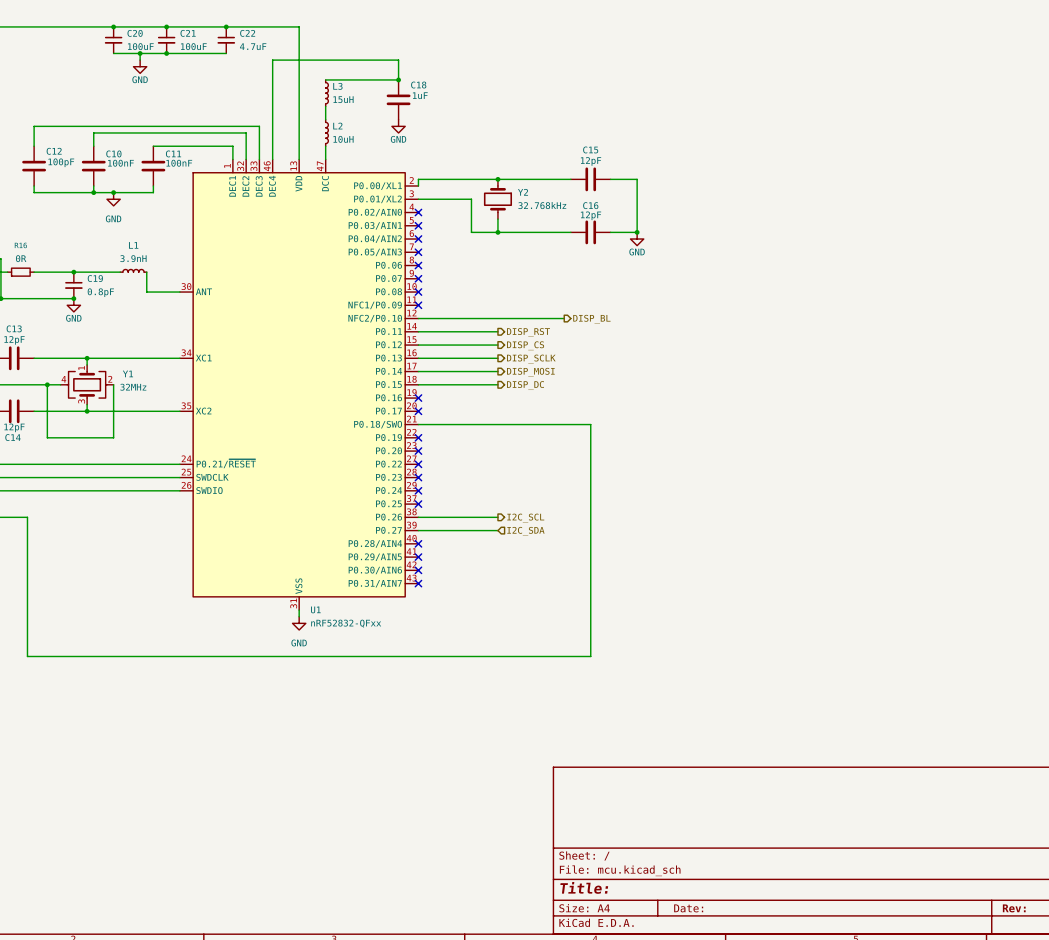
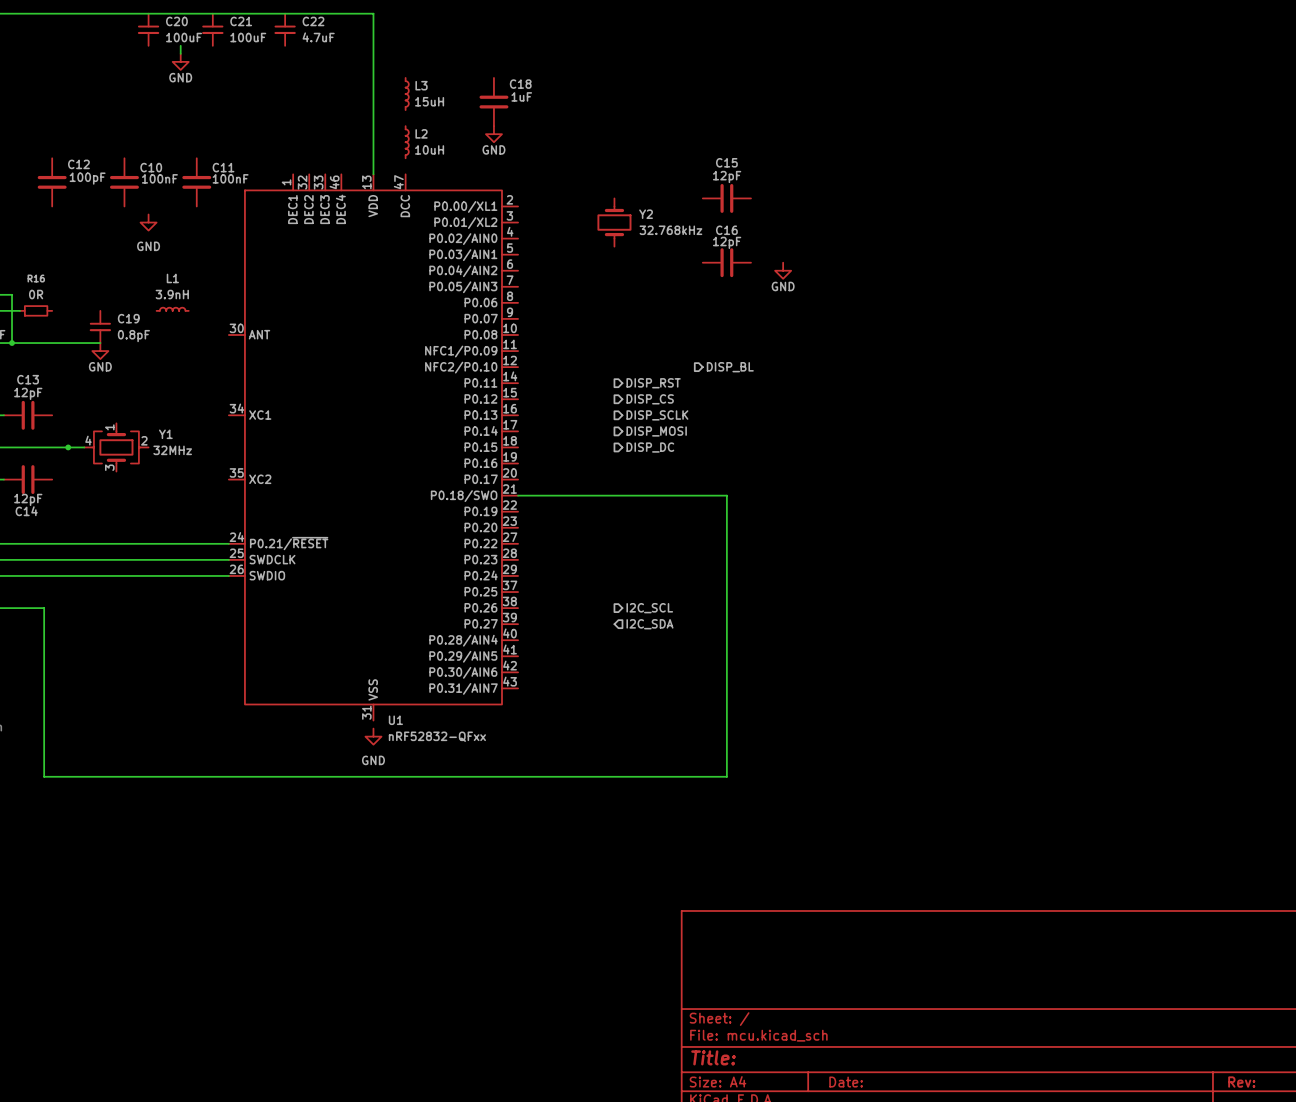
junction: (113, 26) -> none
junction: (166, 26) -> none
junction: (226, 26) -> none
wire: (113, 53) (226, 53) -> none
junction: (140, 53) -> none
junction: (166, 53) -> none
wire: (325, 79) (398, 79) (398, 60) (272, 60) (272, 159) -> none
junction: (398, 79) -> none
wire: (325, 106) (325, 119) -> none
wire: (34, 146) (34, 126) (259, 126) (259, 159) -> none
wire: (93, 146) (93, 132) (246, 132) (246, 159) -> none
wire: (153, 146) (232, 146) (232, 159) -> none
wire: (325, 146) (325, 159) -> none
junction: (497, 179) -> none
wire: (570, 179) (418, 179) (418, 186) -> none
wire: (610, 179) (637, 179) (637, 232) (610, 232) -> none
wire: (34, 186) (34, 192) (153, 192) (153, 186) -> none
wire: (93, 186) (93, 192) -> none
junction: (93, 192) -> none
junction: (113, 192) -> none
wire: (418, 199) (471, 199) (471, 232) (570, 232) -> none
no-connect mark: (418, 212) -> none
wire: (497, 219) (497, 232) -> none
no-connect mark: (418, 225) -> none
junction: (497, 232) -> none
junction: (637, 232) -> none
no-connect mark: (418, 239) -> none
no-connect mark: (418, 252) -> none
no-connect mark: (418, 265) -> none
wire: (34, 272) (120, 272) -> none
junction: (73, 272) -> none
wire: (146, 272) (146, 292) (179, 292) -> none
no-connect mark: (418, 278) -> none
no-connect mark: (418, 292) -> none
junction: (73, 298) -> none
no-connect mark: (418, 305) -> none
wire: (418, 318) (564, 318) -> none
wire: (418, 331) (497, 331) -> none
wire: (418, 345) (497, 345) -> none
wire: (34, 358) (179, 358) -> none
wire: (87, 358) (87, 364) -> none
junction: (87, 358) -> none
wire: (418, 358) (497, 358) -> none
wire: (418, 371) (497, 371) -> none
wire: (47, 384) (47, 437) (113, 437) (113, 384) -> none
wire: (418, 384) (497, 384) -> none
no-connect mark: (418, 398) -> none
wire: (87, 404) (87, 411) -> none
wire: (34, 411) (179, 411) -> none
junction: (87, 411) -> none
no-connect mark: (418, 411) -> none
no-connect mark: (418, 437) -> none
no-connect mark: (418, 451) -> none
no-connect mark: (418, 464) -> none
no-connect mark: (418, 477) -> none
no-connect mark: (418, 490) -> none
no-connect mark: (418, 504) -> none
wire: (418, 517) (497, 517) -> none
wire: (418, 530) (497, 530) -> none
no-connect mark: (418, 543) -> none
no-connect mark: (418, 557) -> none
no-connect mark: (418, 570) -> none
no-connect mark: (418, 583) -> none
wire: (299, 610) (299, 616) -> none

